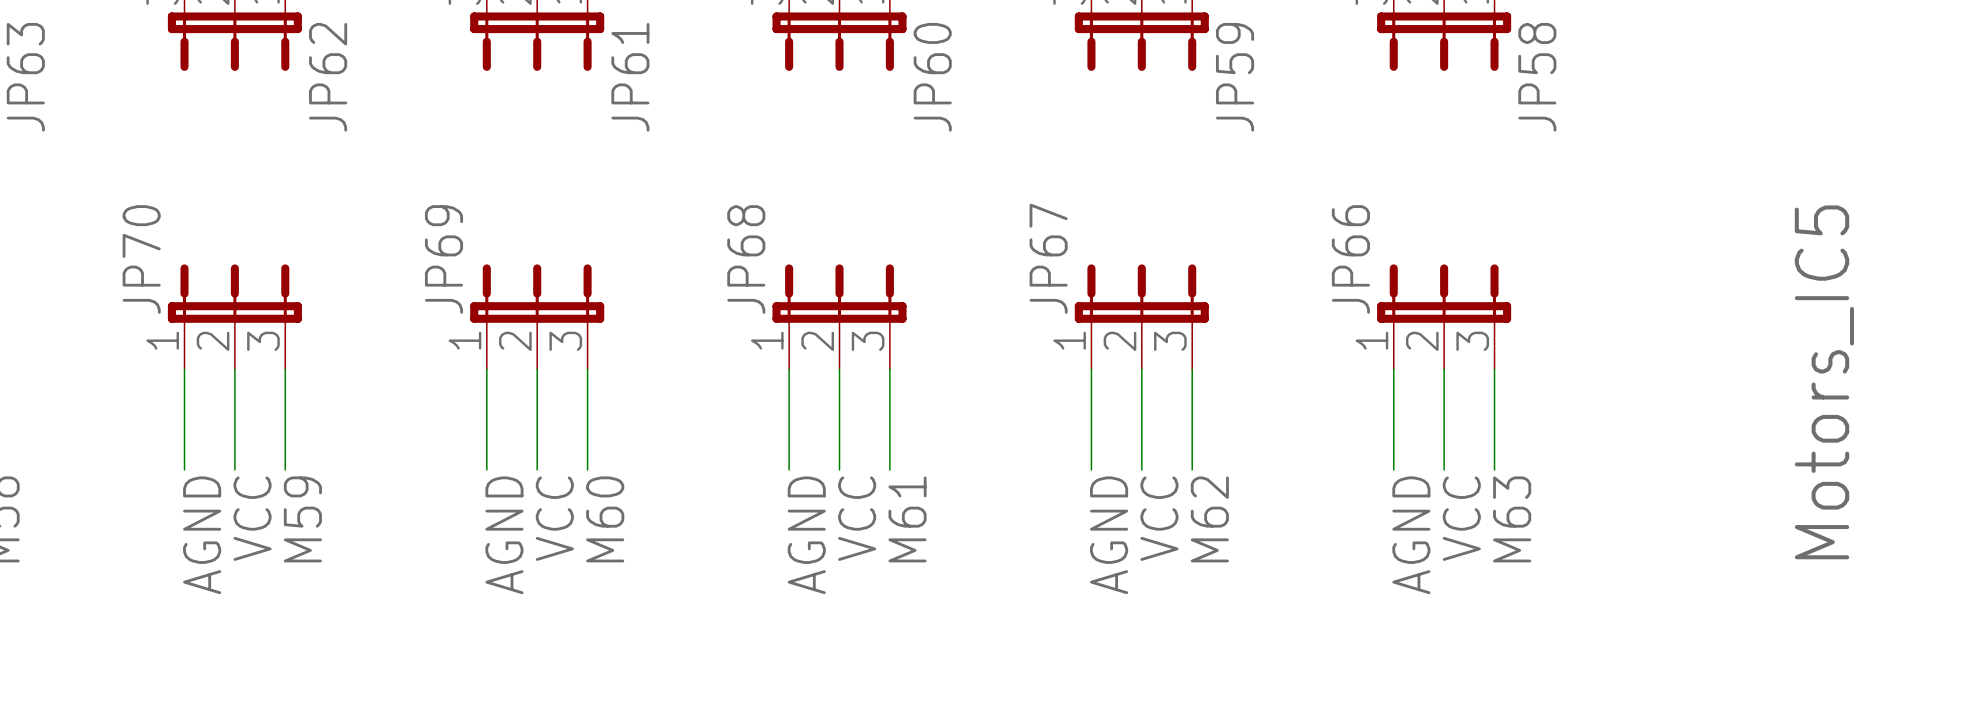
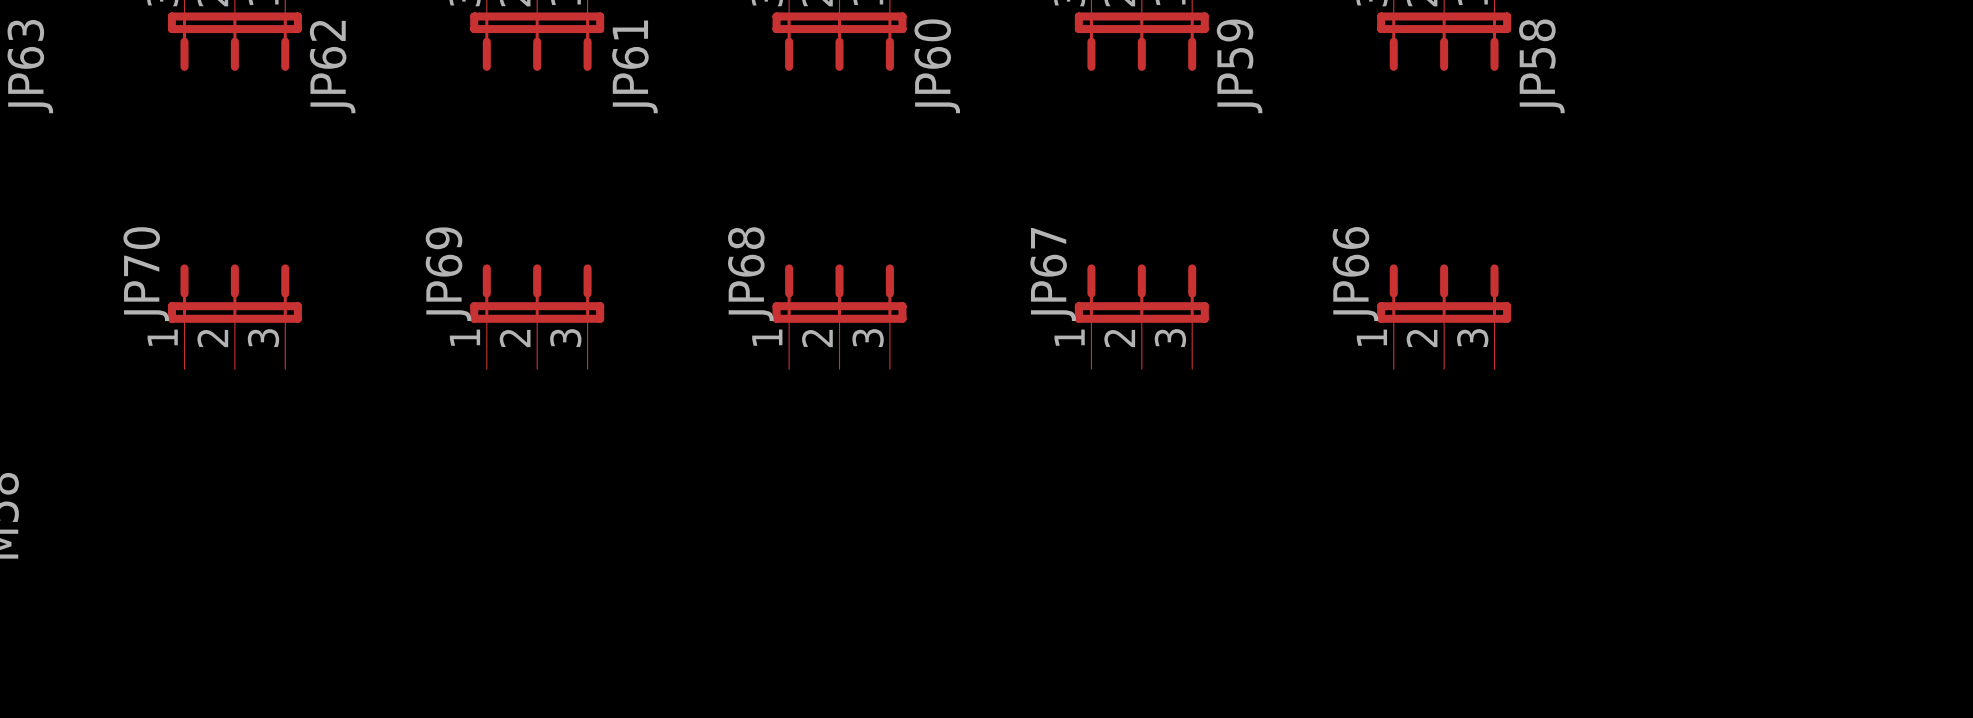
wire: (184, 369) (184, 469) -> none
wire: (234, 369) (234, 469) -> none
wire: (285, 369) (285, 469) -> none
wire: (486, 369) (486, 469) -> none
wire: (537, 369) (537, 469) -> none
wire: (587, 369) (587, 469) -> none
wire: (789, 369) (789, 469) -> none
wire: (839, 369) (839, 469) -> none
wire: (889, 369) (889, 469) -> none
wire: (1091, 369) (1091, 469) -> none
wire: (1141, 369) (1141, 469) -> none
wire: (1192, 369) (1192, 469) -> none
wire: (1393, 369) (1393, 469) -> none
wire: (1444, 369) (1444, 469) -> none
wire: (1494, 369) (1494, 469) -> none
text: Motors_IC5 (1824, 382) -> none
label: VCC (252, 518) -> none
label: VCC (554, 518) -> none
label: VCC (857, 518) -> none
label: VCC (1159, 518) -> none
label: VCC (1461, 518) -> none
label: M59 (302, 519) -> none
label: M60 (605, 519) -> none
label: M61 (907, 519) -> none
label: M62 (1209, 519) -> none
label: M63 (1512, 519) -> none
label: AGND (202, 535) -> none
label: AGND (504, 535) -> none
label: AGND (806, 535) -> none
label: AGND (1109, 535) -> none
label: AGND (1411, 535) -> none

